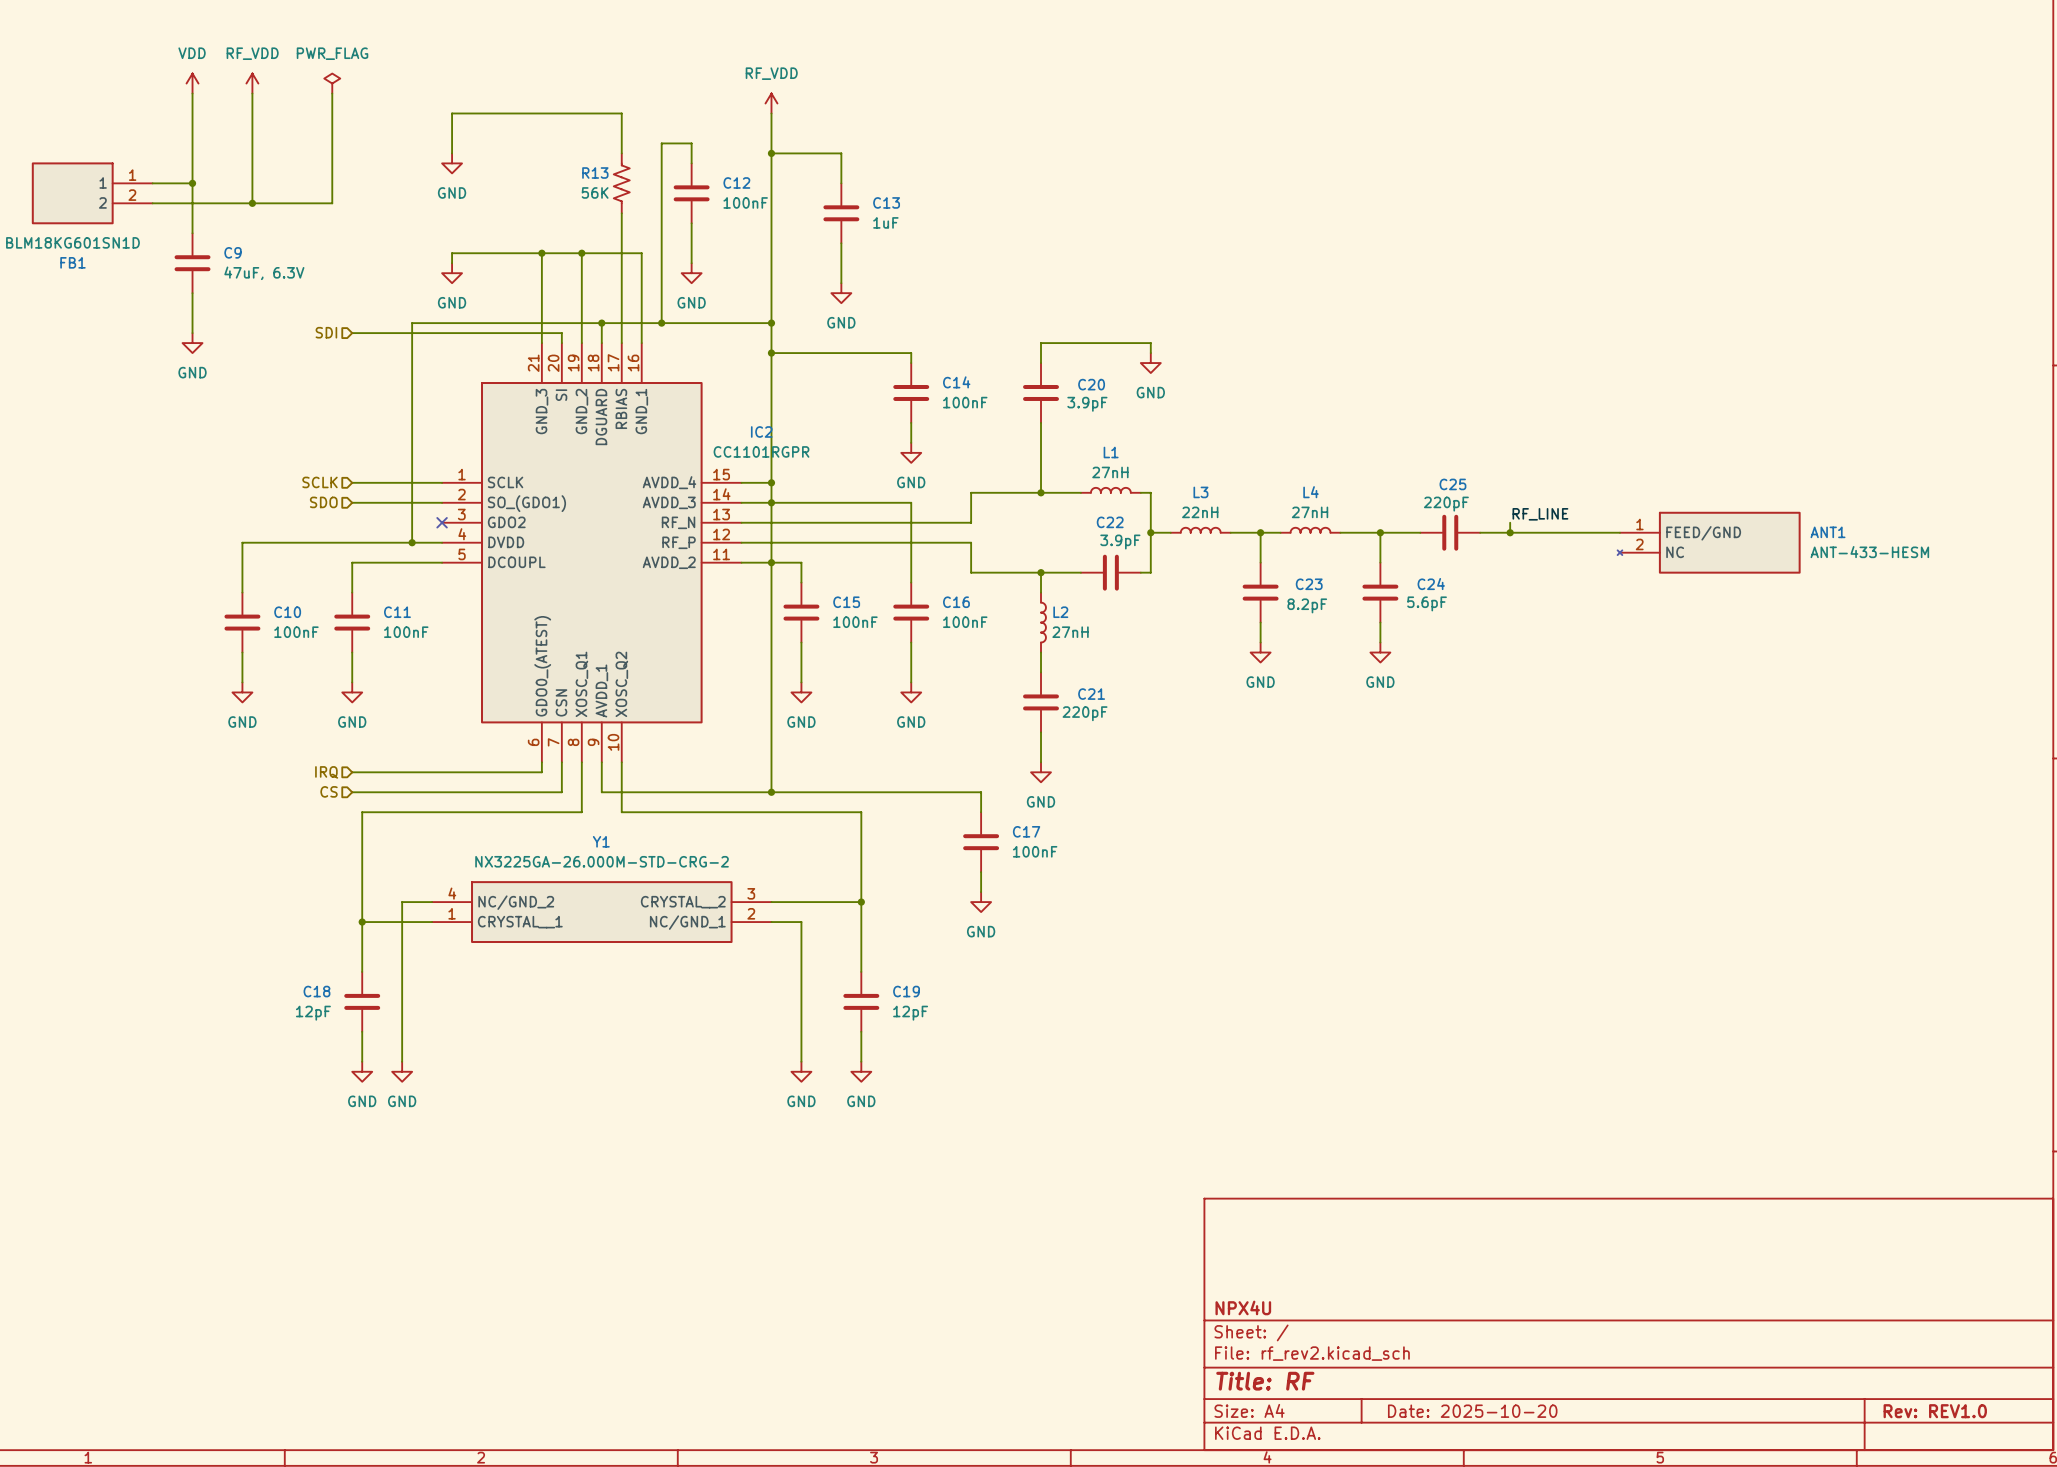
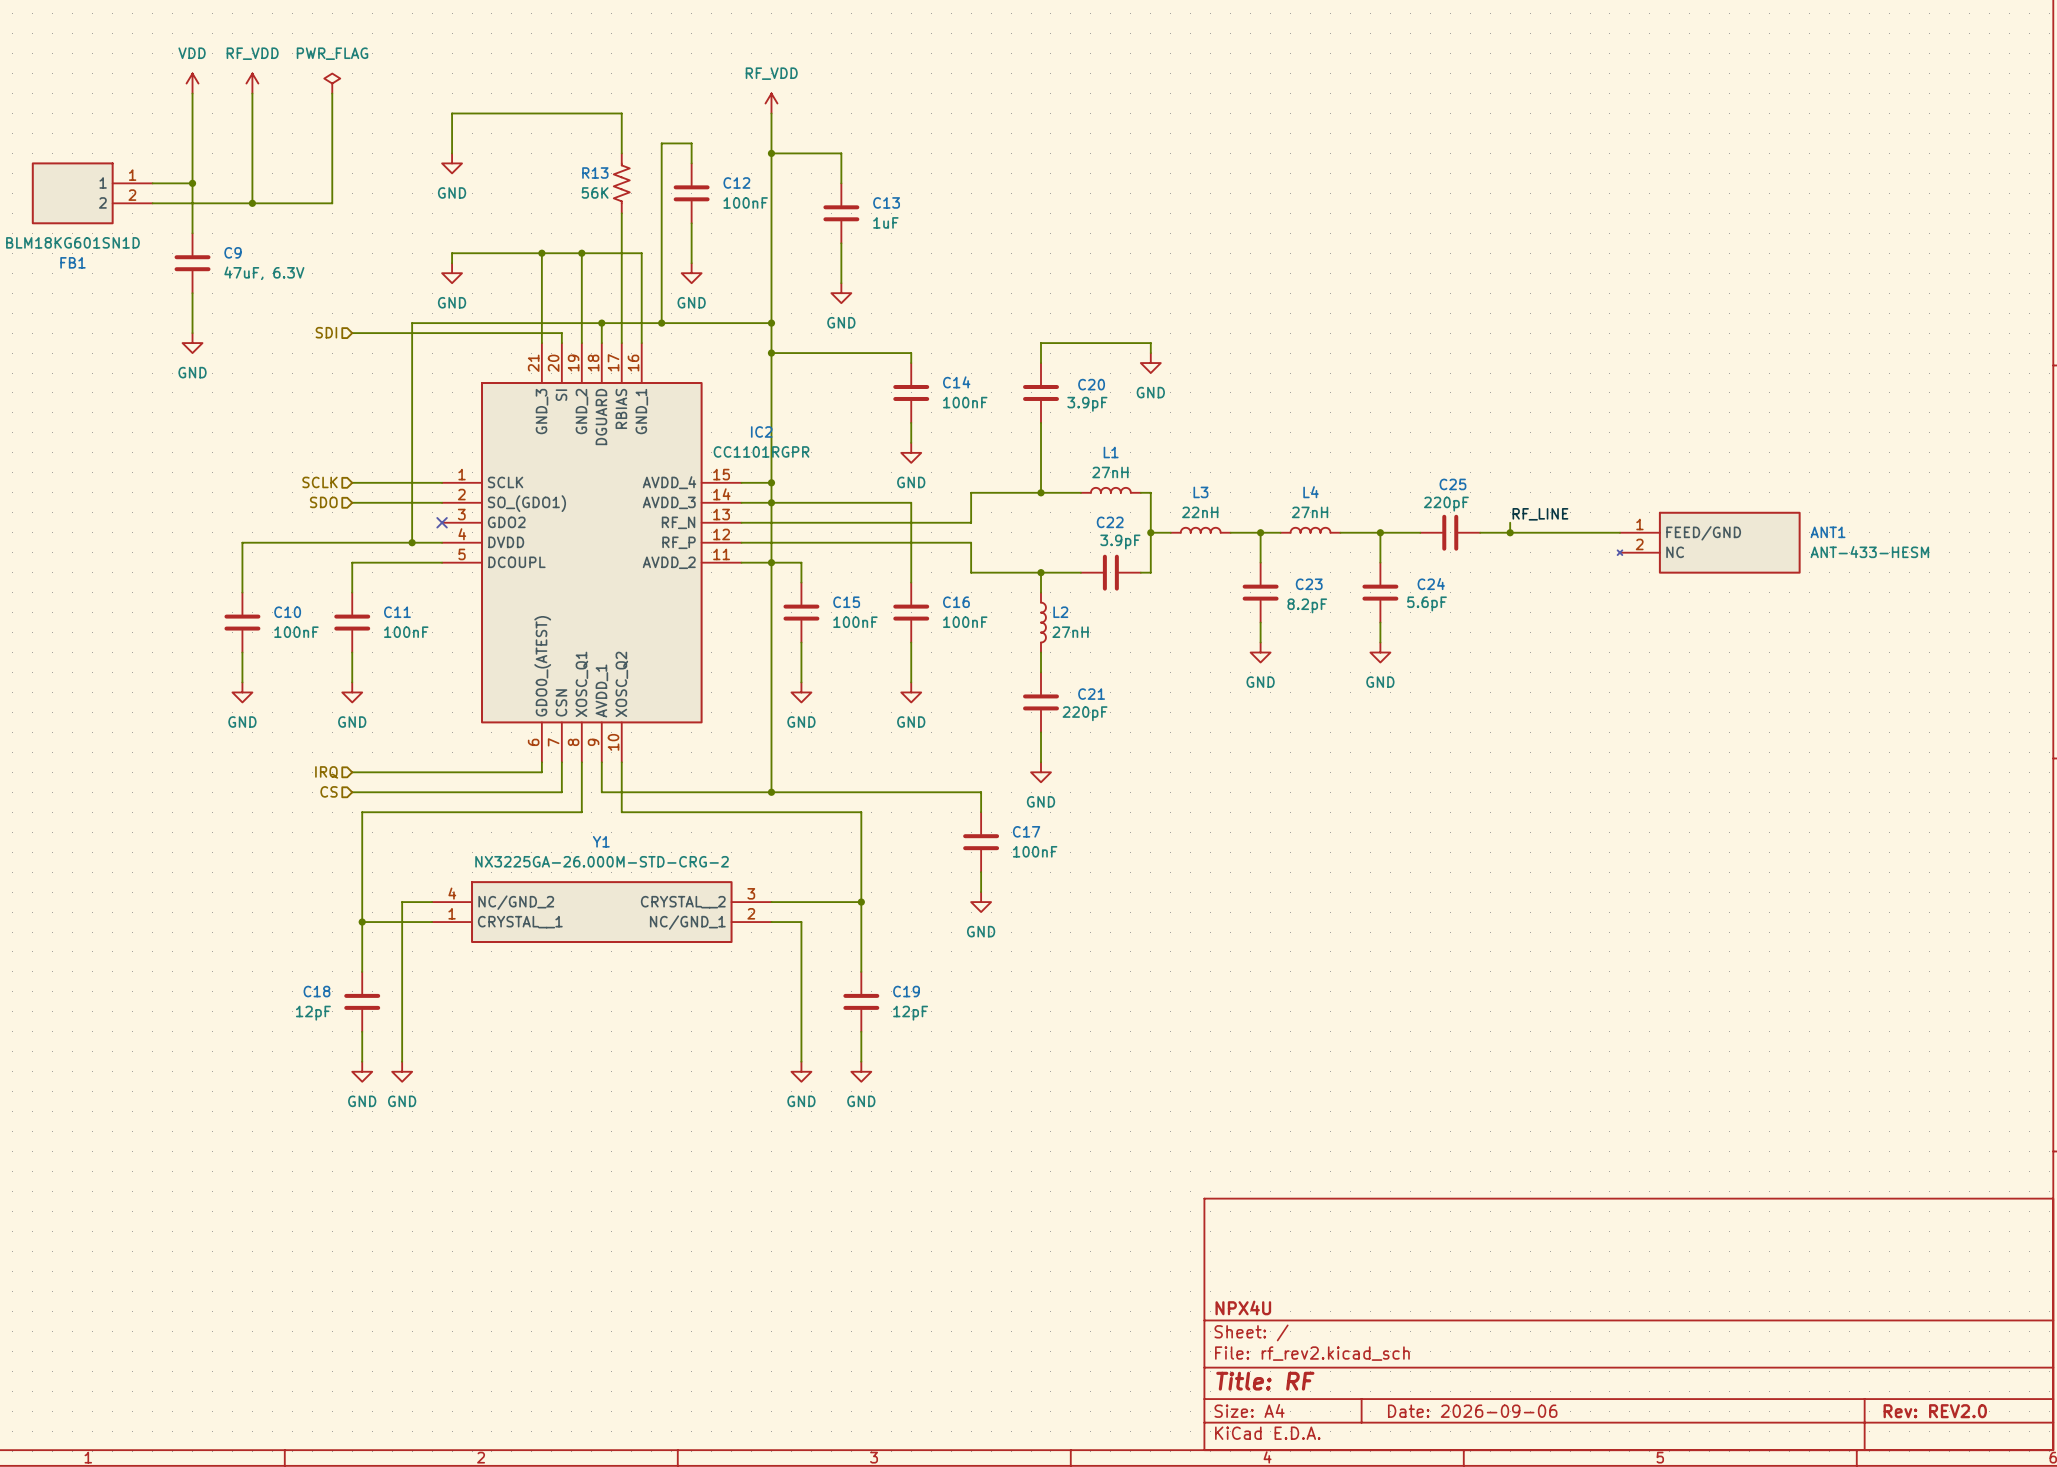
title block: Date: 2025-10-20 (1472, 1411) -> Date: 2026-09-06 (1472, 1411)
title block: Rev: REV1.0 (1935, 1411) -> Rev: REV2.0 (1935, 1411)

